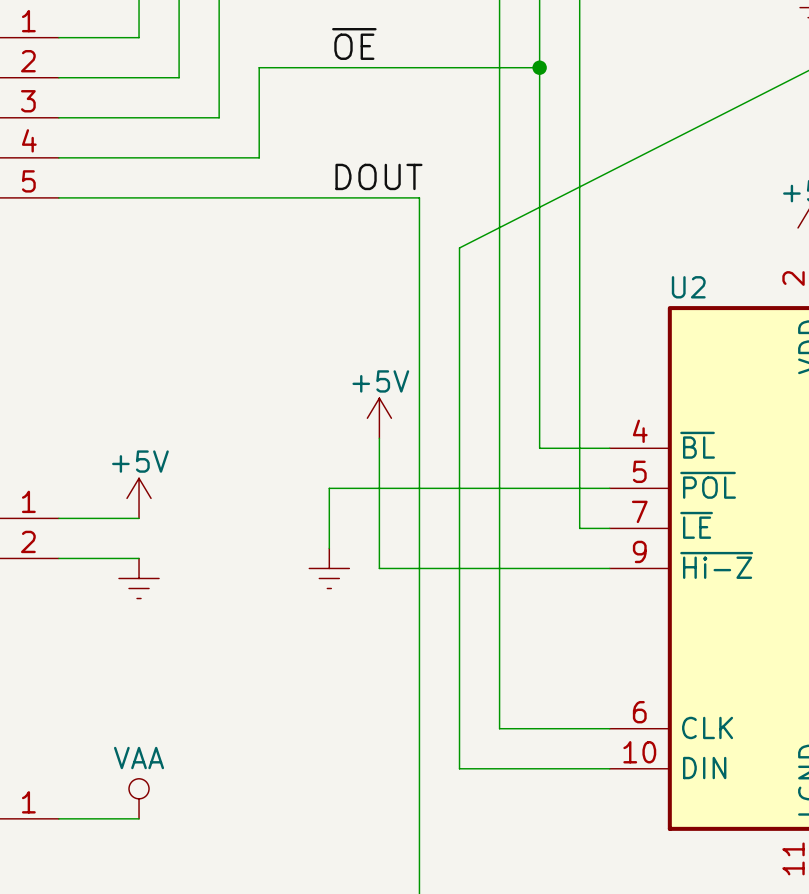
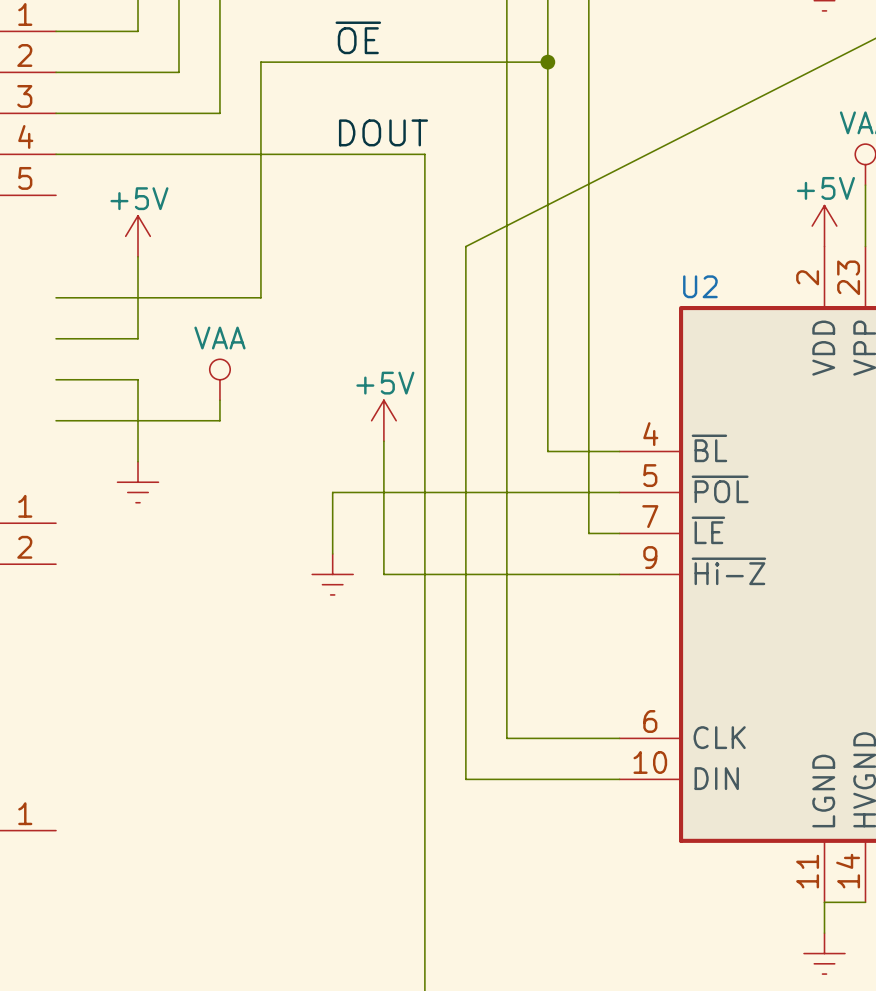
label position: DOUT (378, 176) -> DOUT (383, 132)
wire: (58, 197) (419, 197) -> (56, 297) (260, 297) (260, 154) (424, 154) (424, 195)
wire: none -> (138, 256) (138, 338) (56, 338)
wire: none -> (56, 379) (138, 379) (138, 461)
power symbol: none -> VAA (219, 379)
wire: none -> (219, 400) (219, 420) (56, 420)
power symbol position: +5V (139, 498) -> +5V (138, 236)
wire: (58, 518) (139, 518) -> none
wire: (58, 558) (139, 558) -> none
power symbol position: (139, 578) -> (138, 482)
power symbol: VAA (139, 798) -> none
wire: (58, 818) (139, 818) -> none

